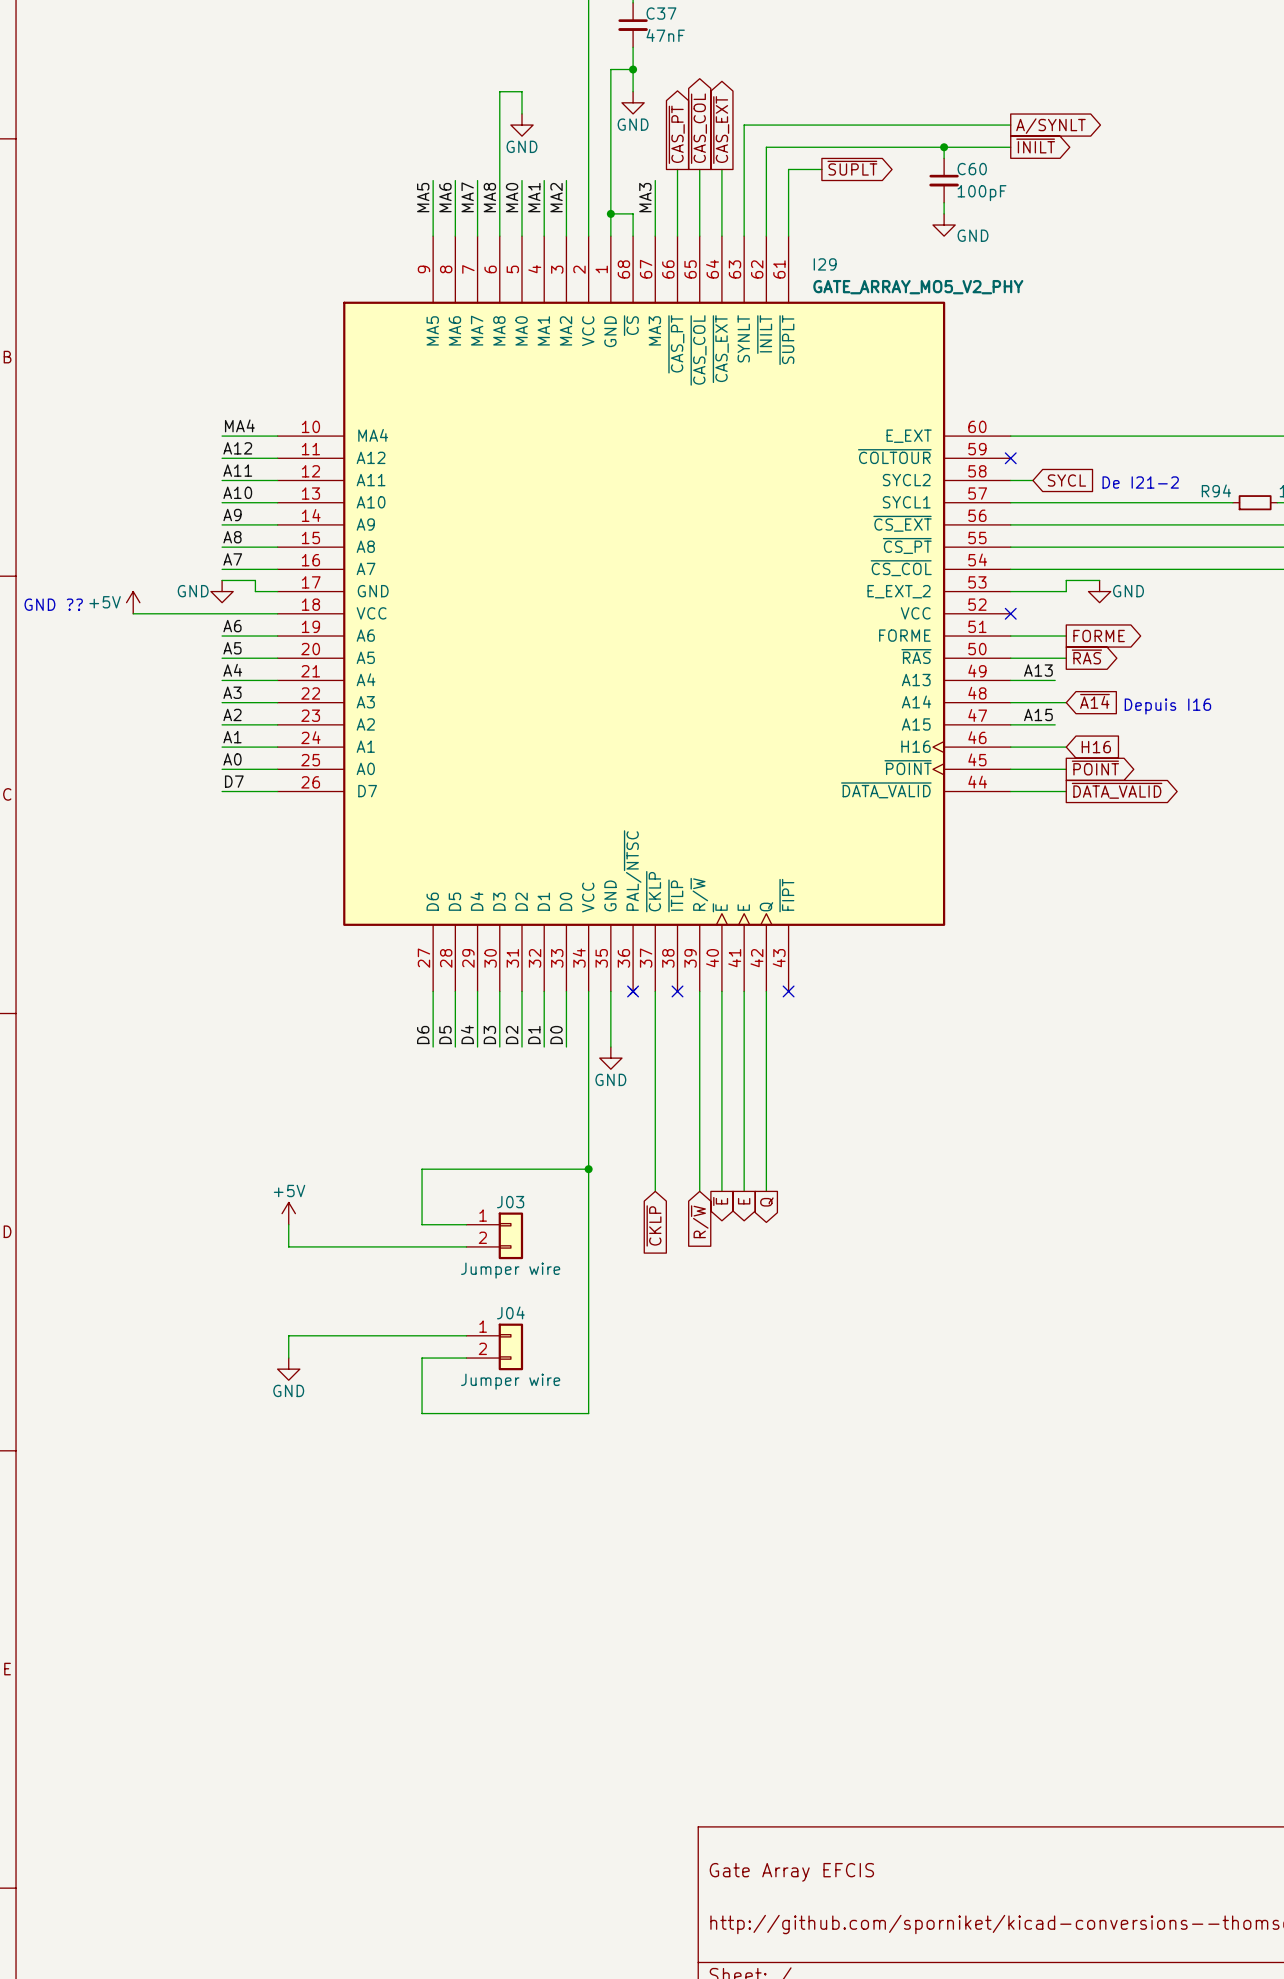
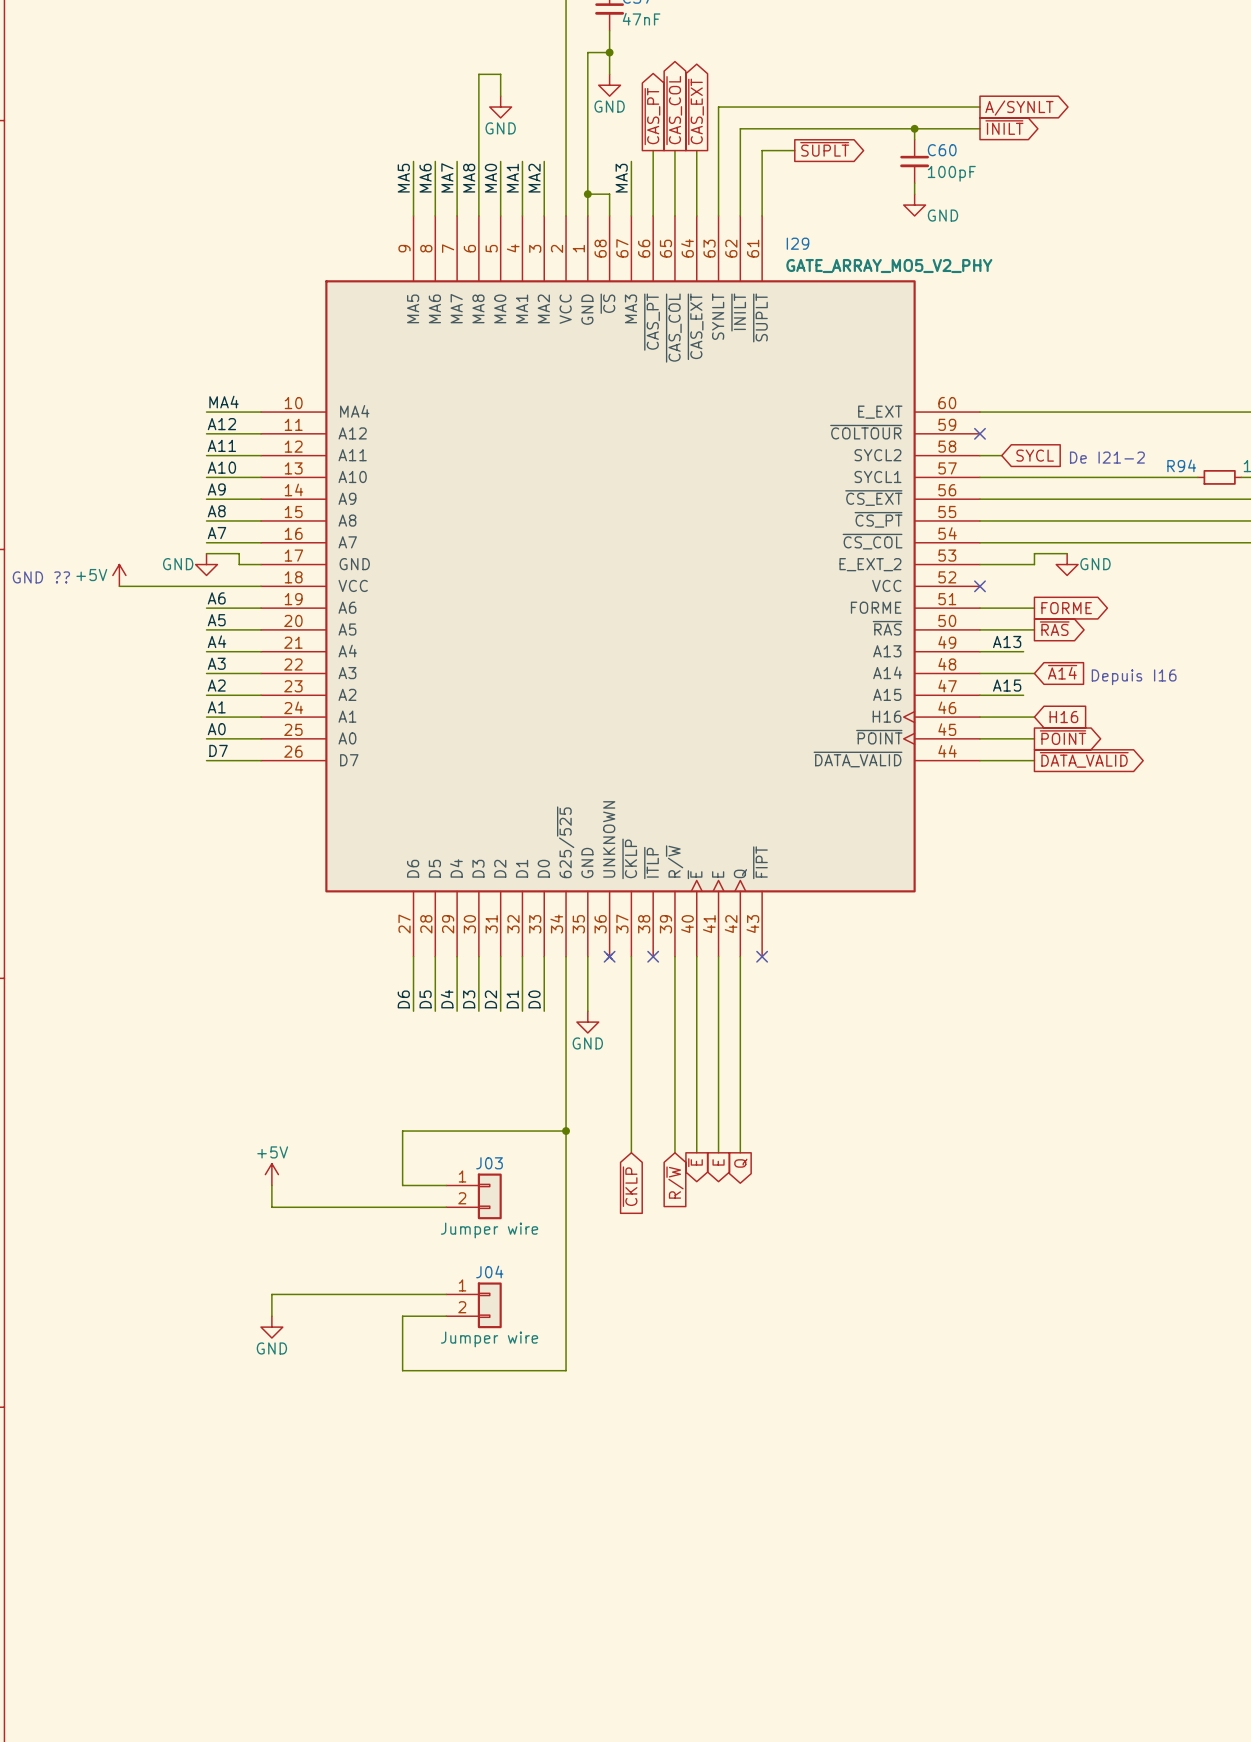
I29 pin name: PAL/~{NTSC} (632, 870) -> UNKNOWN (609, 839)
I29 pin name: VCC (588, 897) -> 625/~{525} (565, 842)

